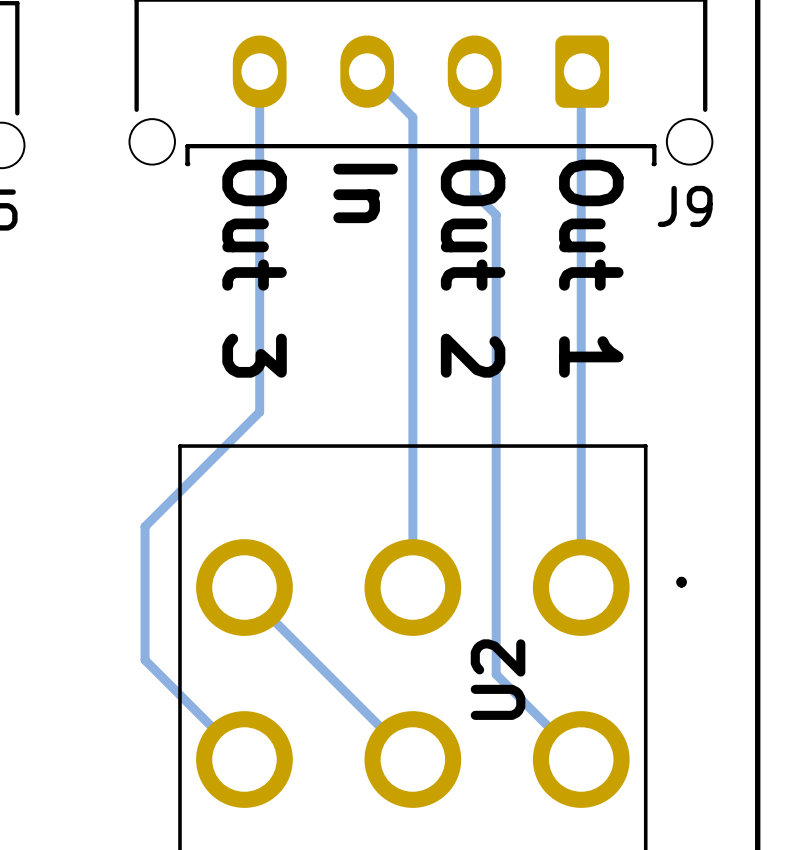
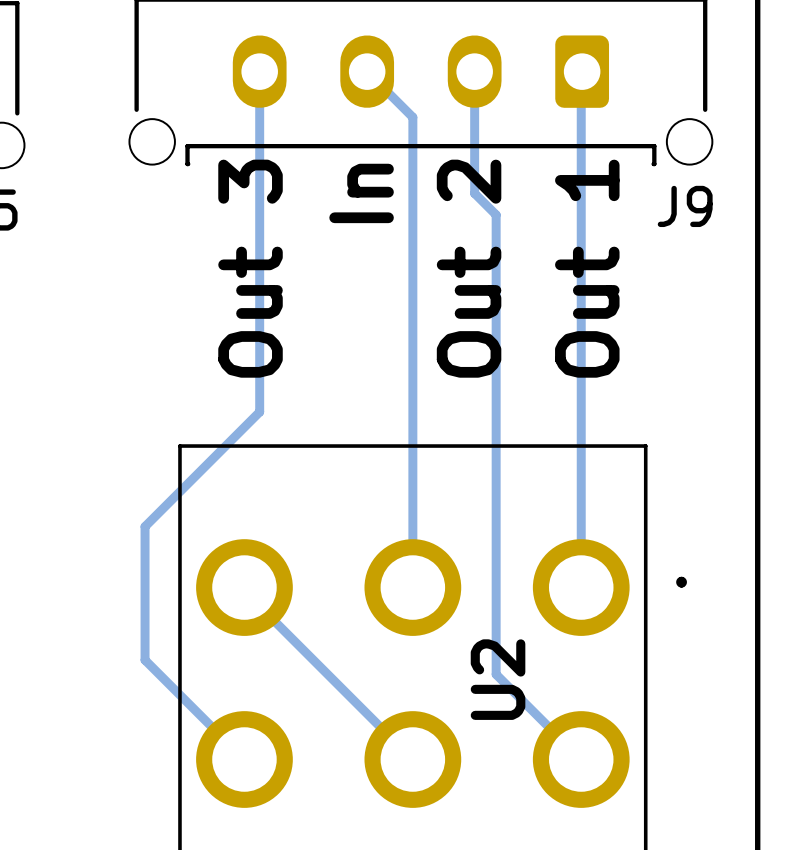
text rotation: 0° (365, 193) -> 180° (361, 193)
text rotation: 0° (254, 268) -> 180° (250, 268)
text rotation: 0° (473, 268) -> 180° (469, 268)
text rotation: 0° (591, 268) -> 180° (587, 268)

